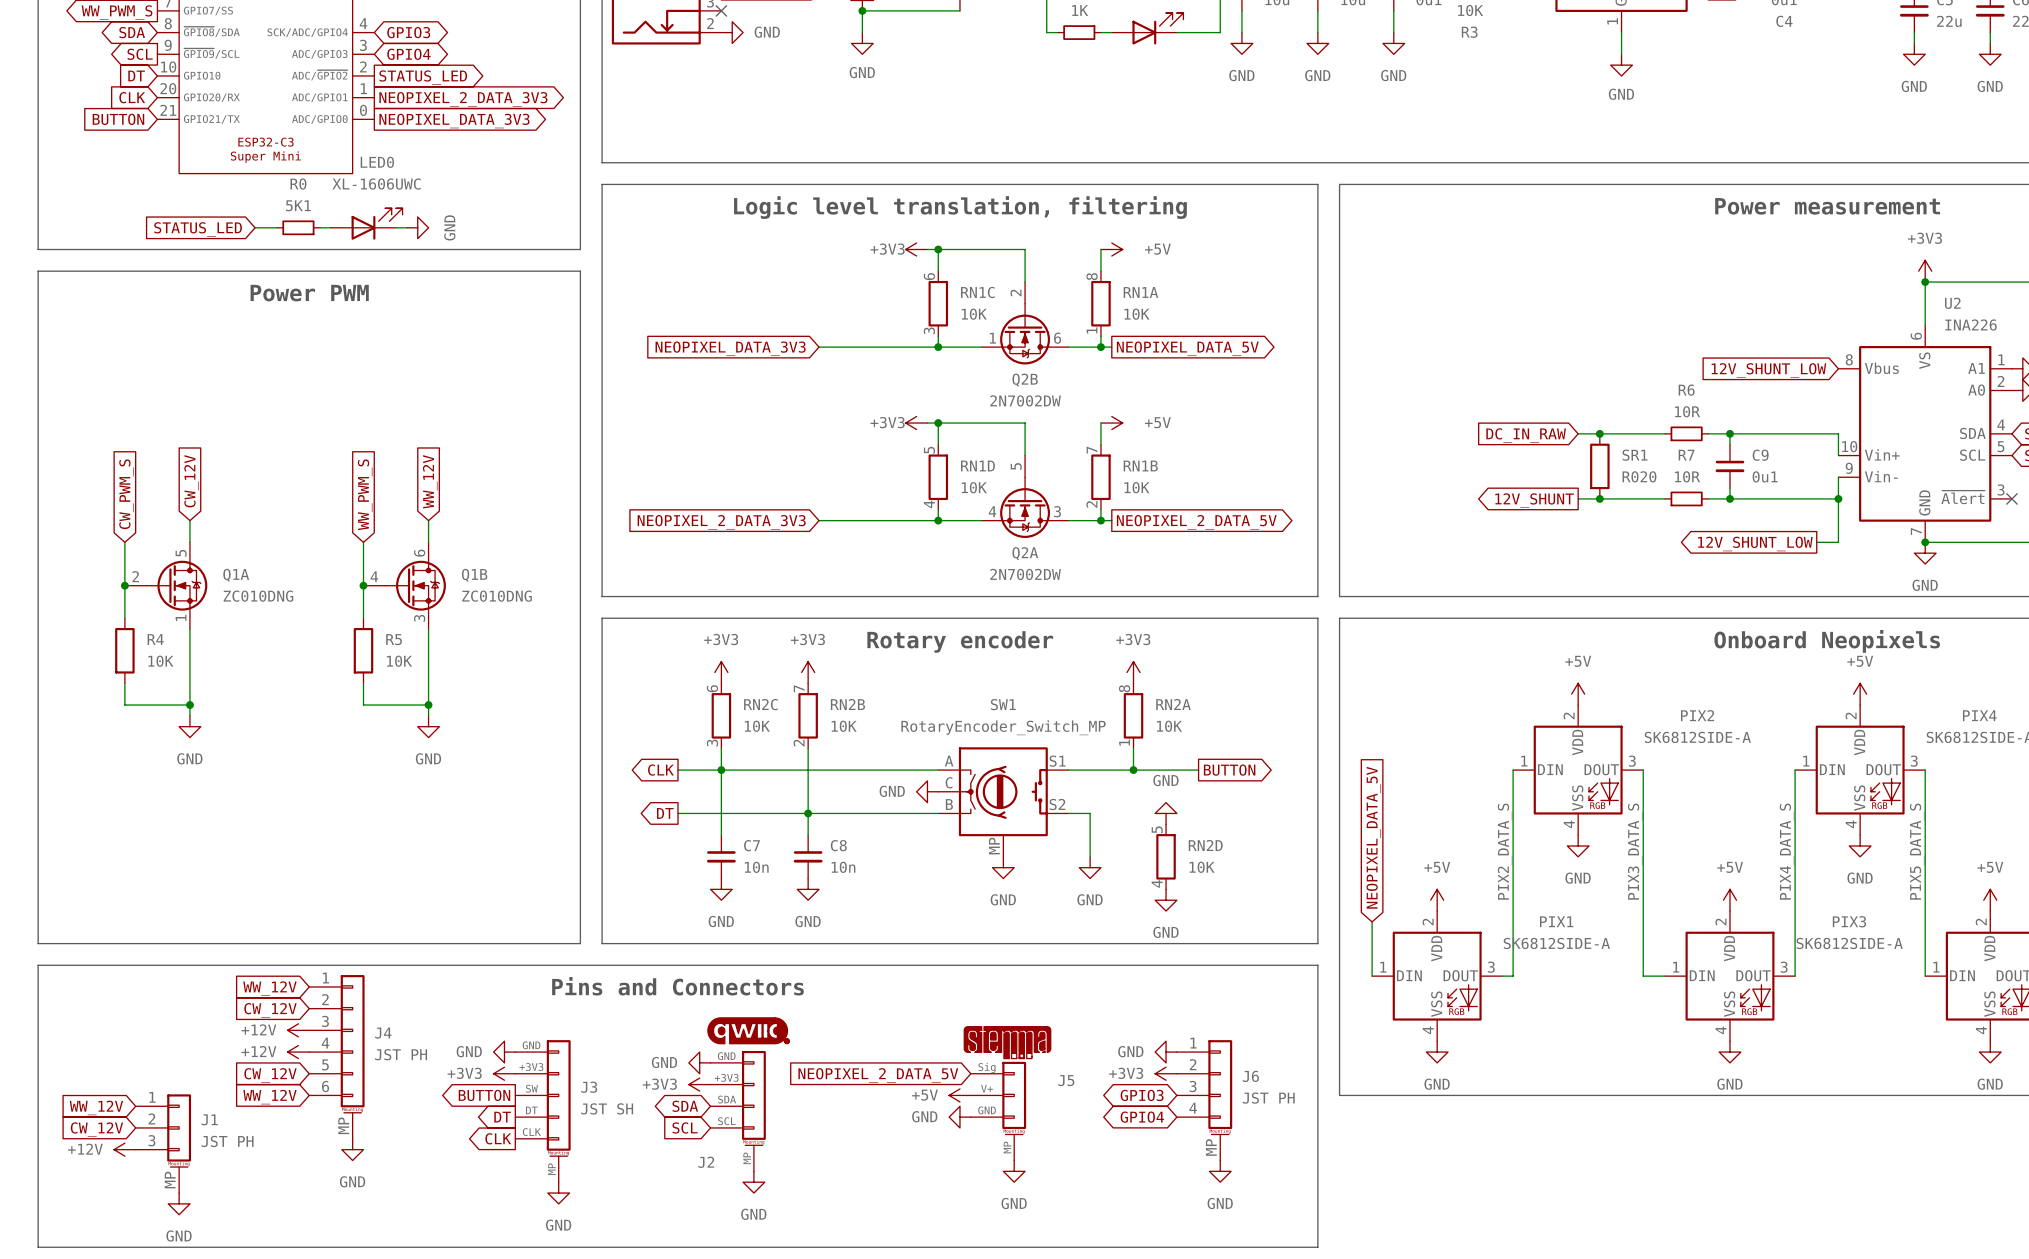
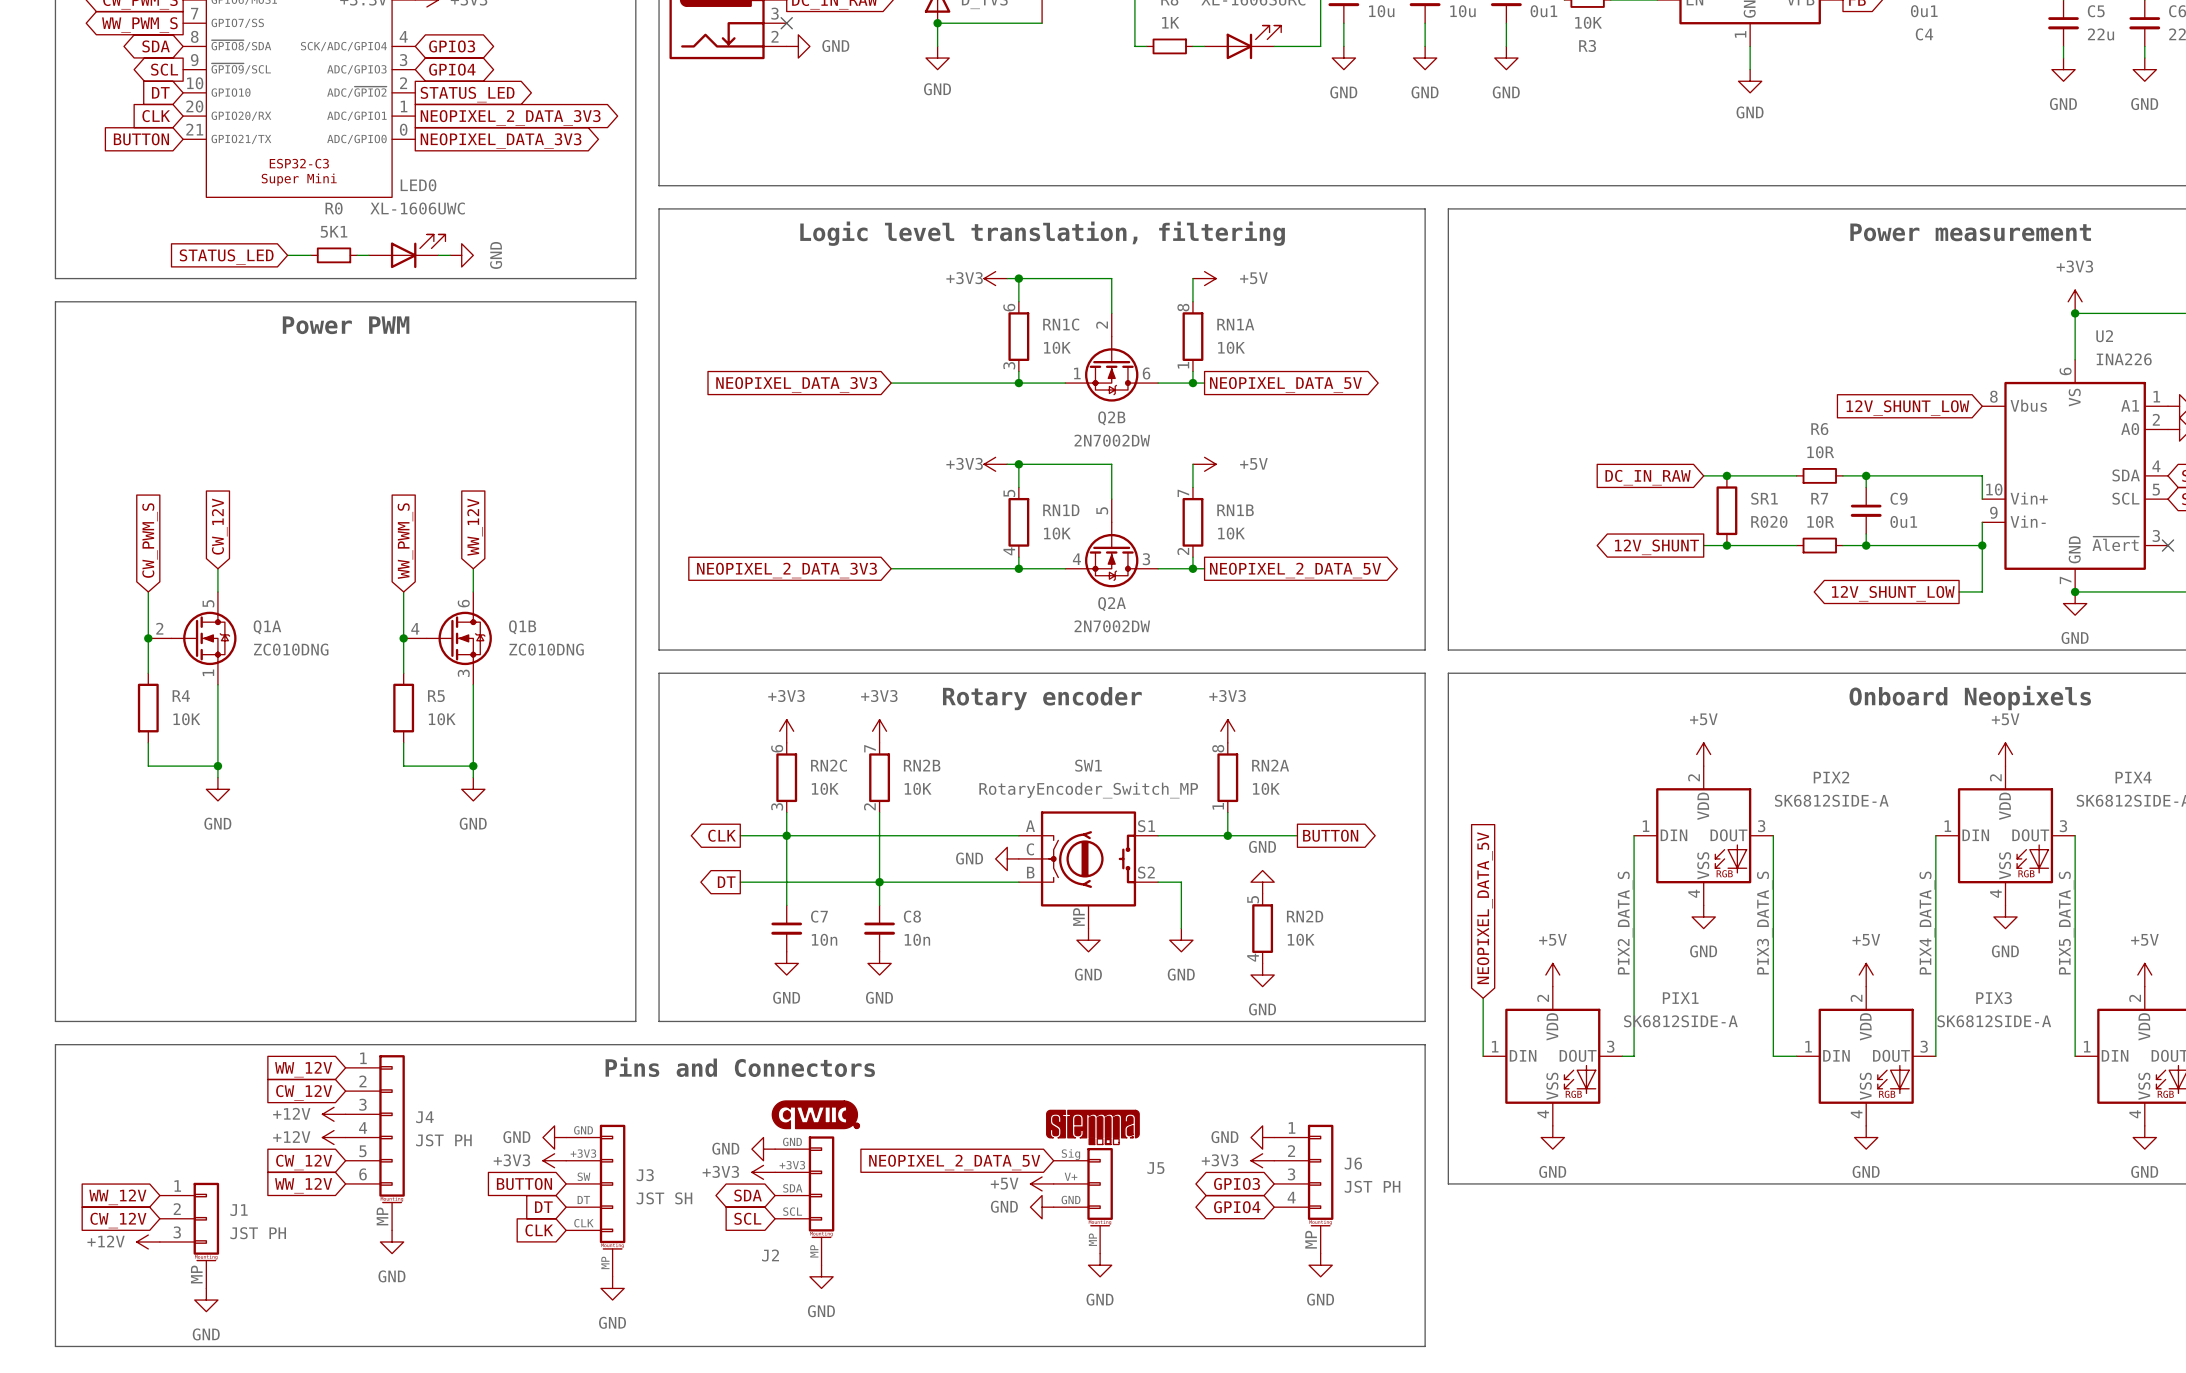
global label shape: output (484, 1095) -> input (524, 1183)
global label shape: output (502, 1117) -> input (543, 1207)
global label shape: output (498, 1138) -> input (539, 1230)

